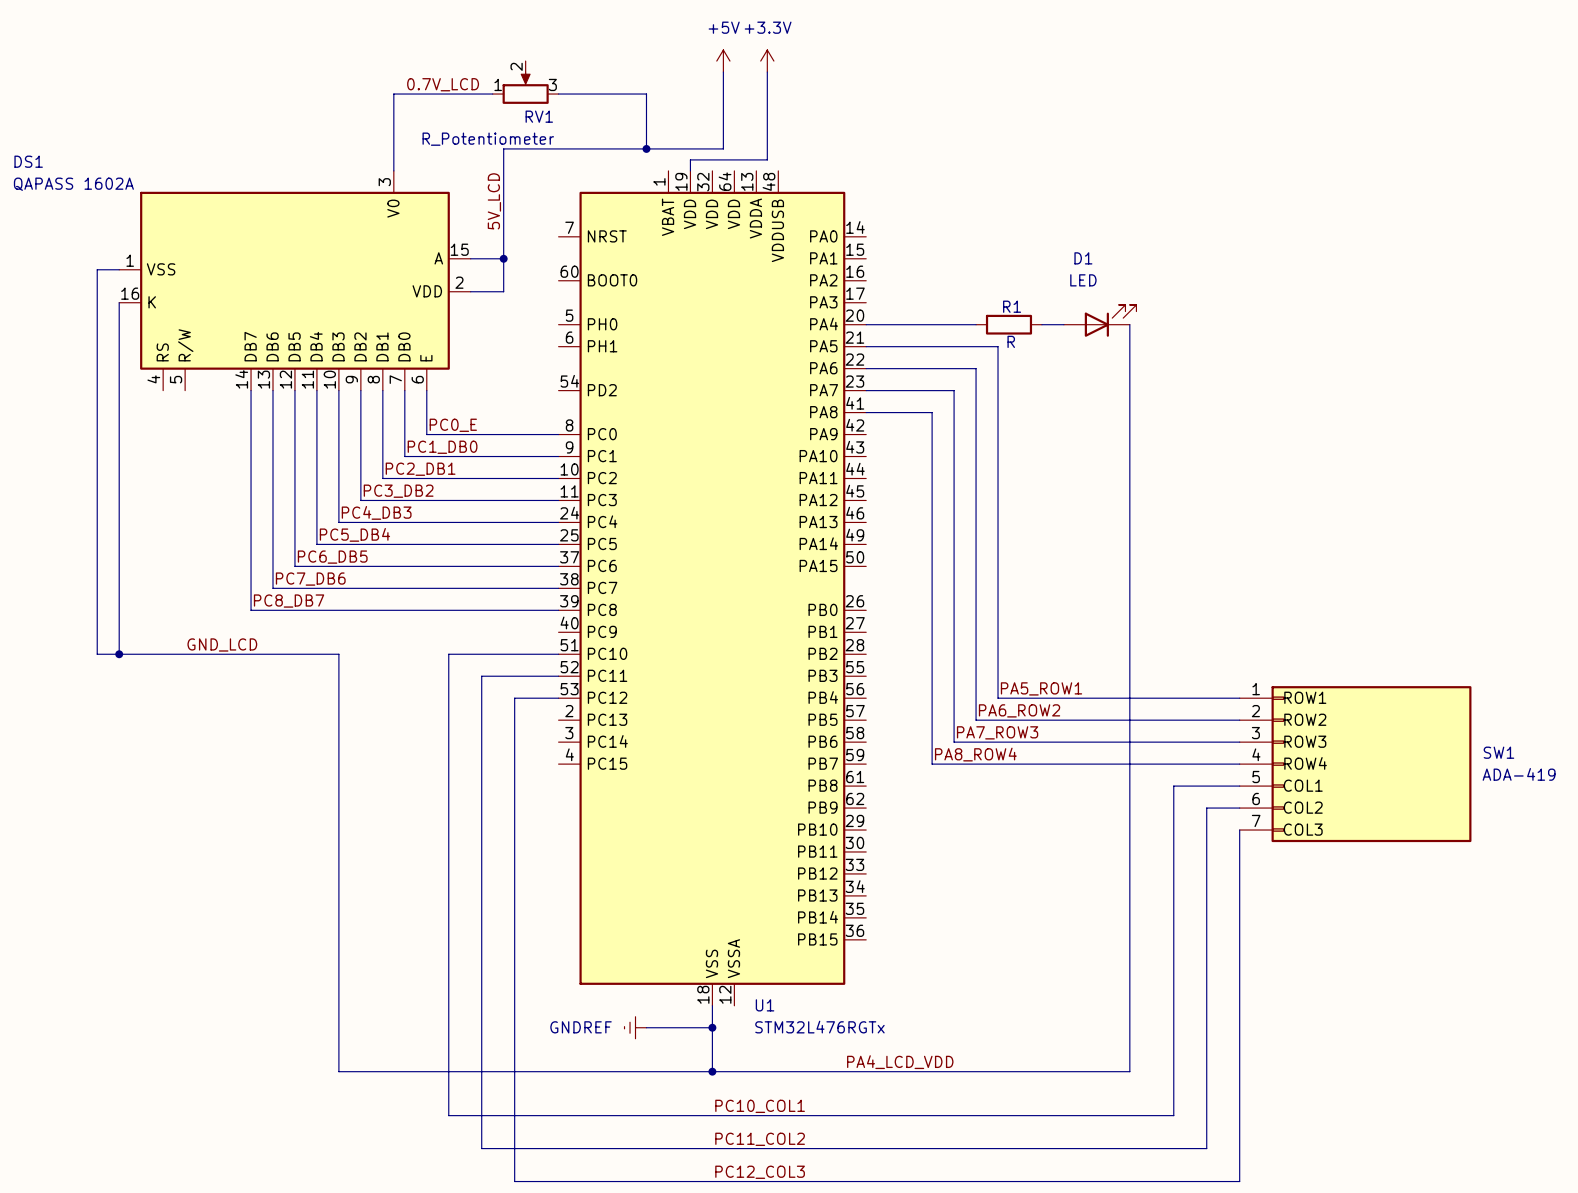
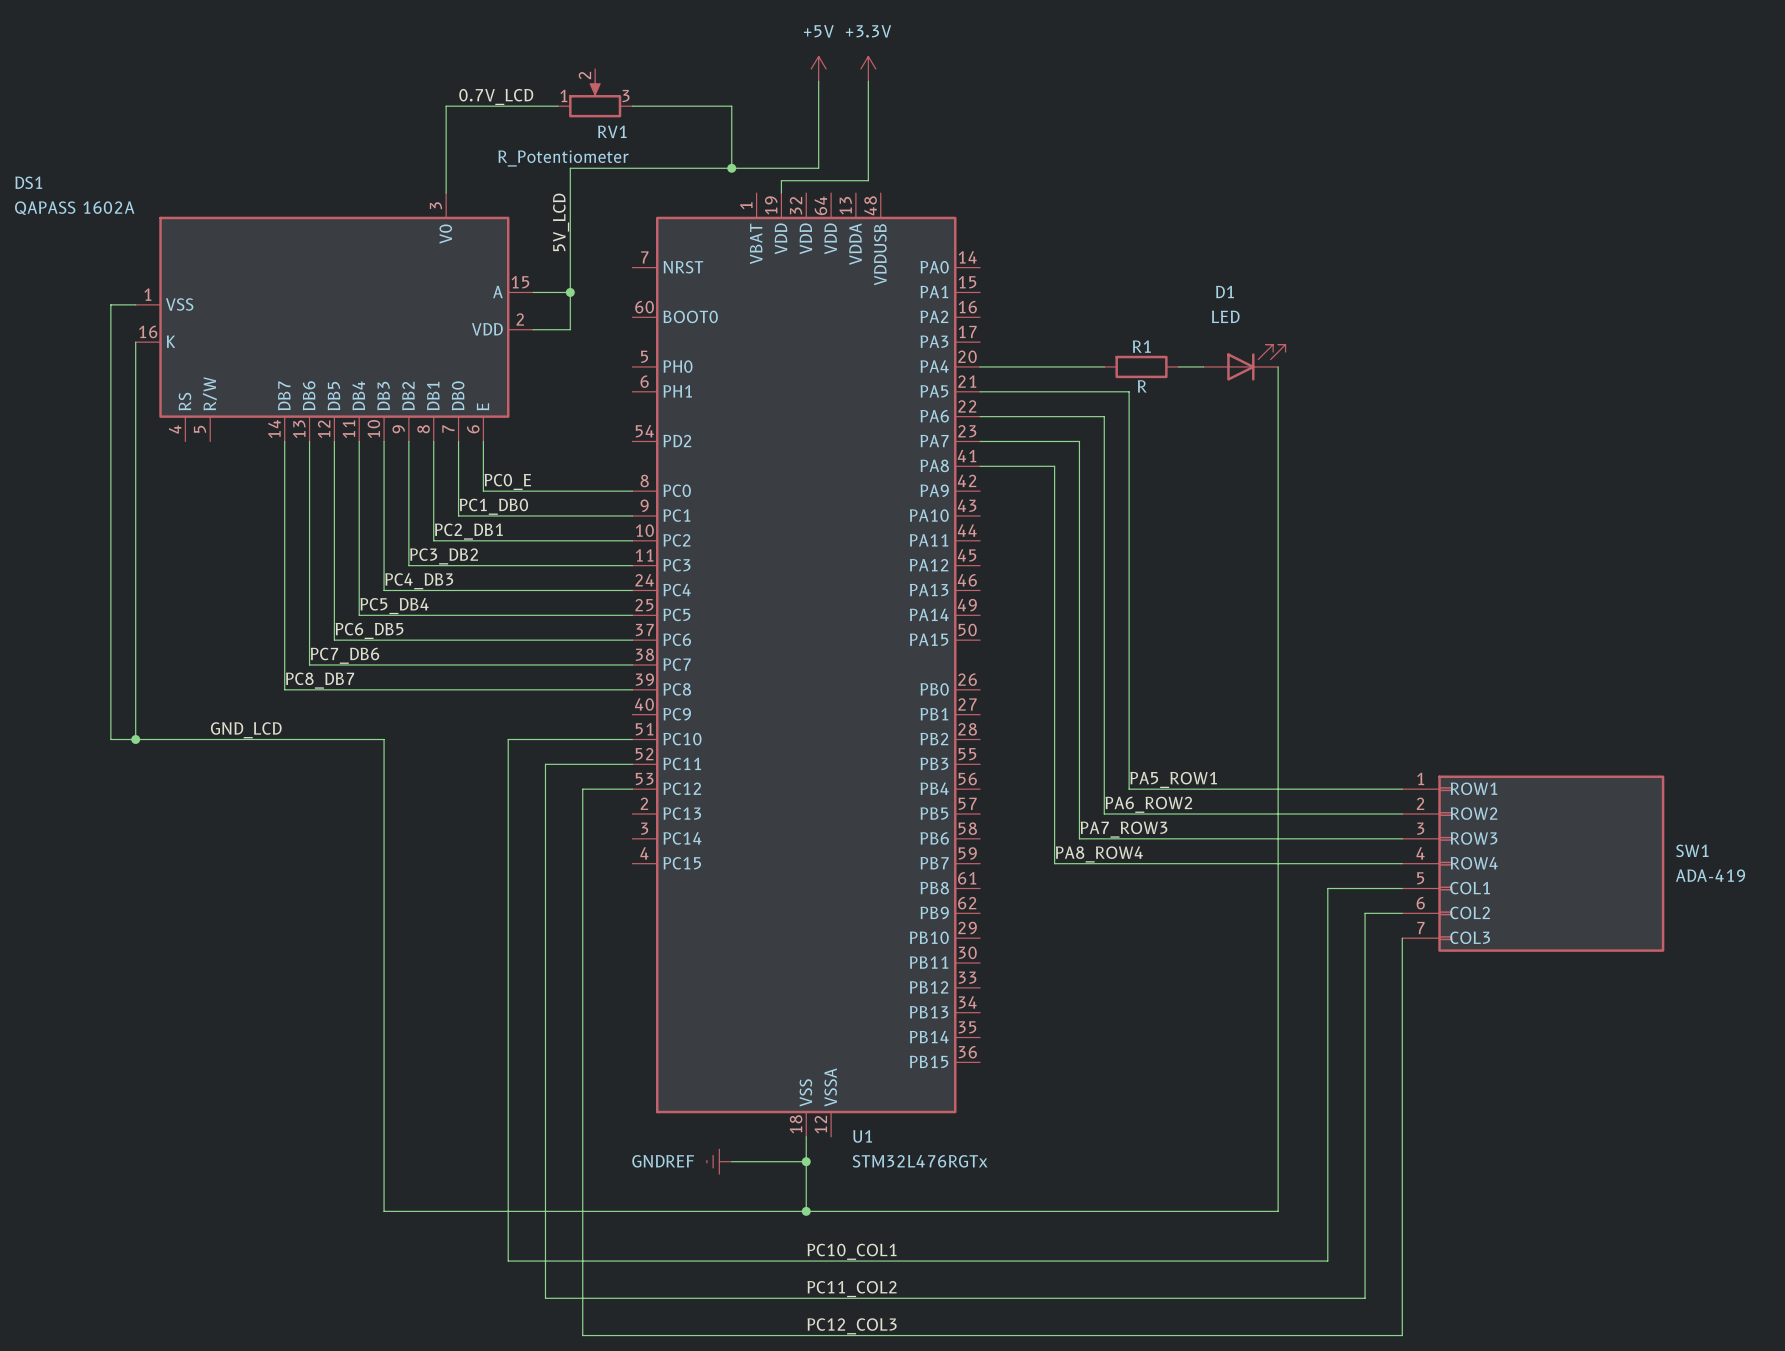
label: PA4_LCD_VDD (900, 1062) -> none

